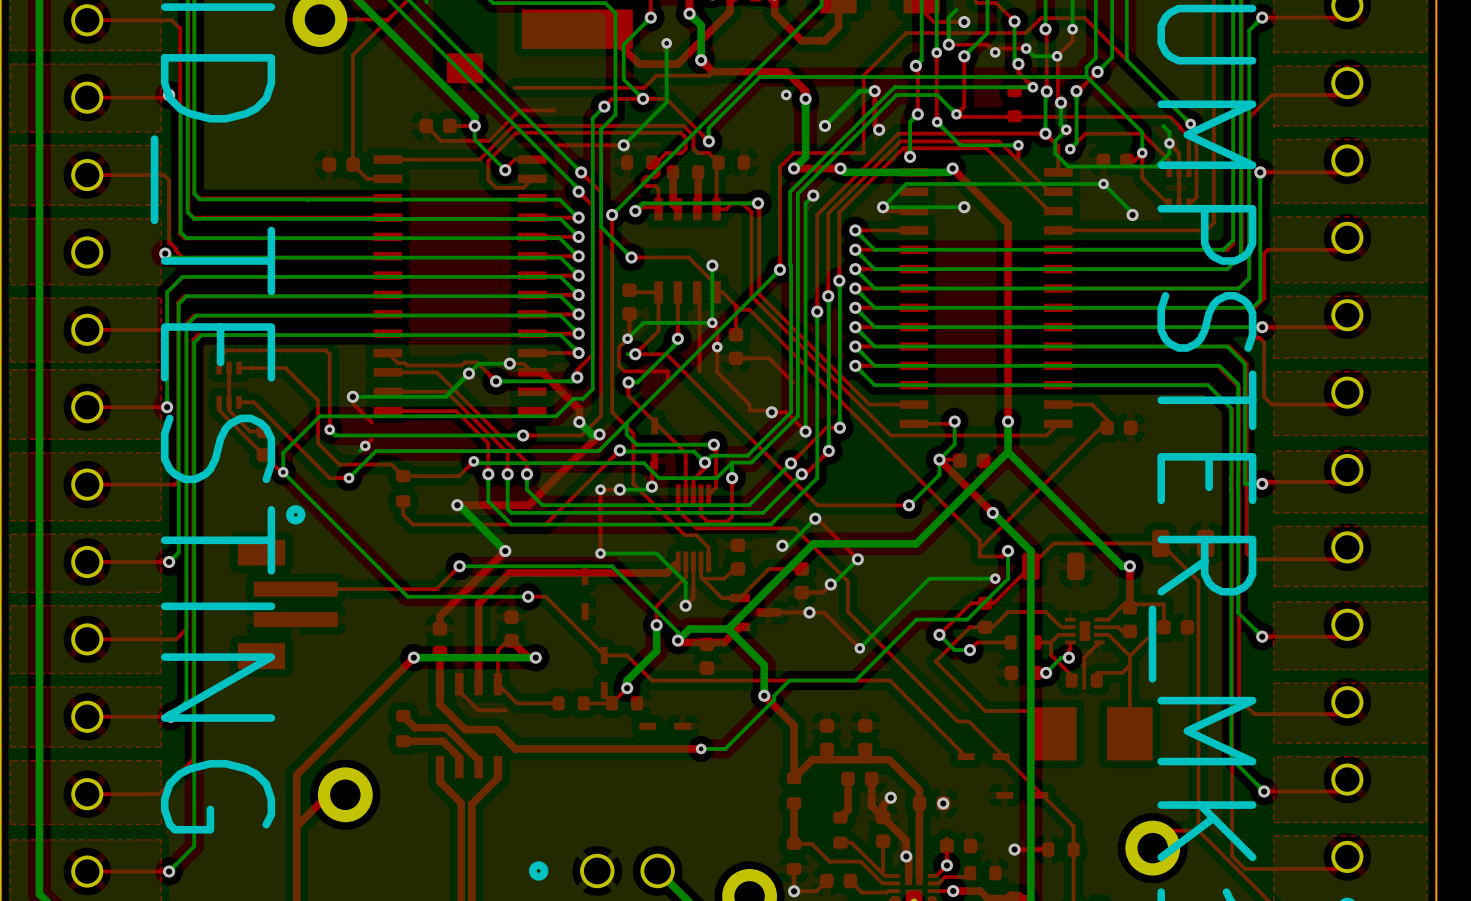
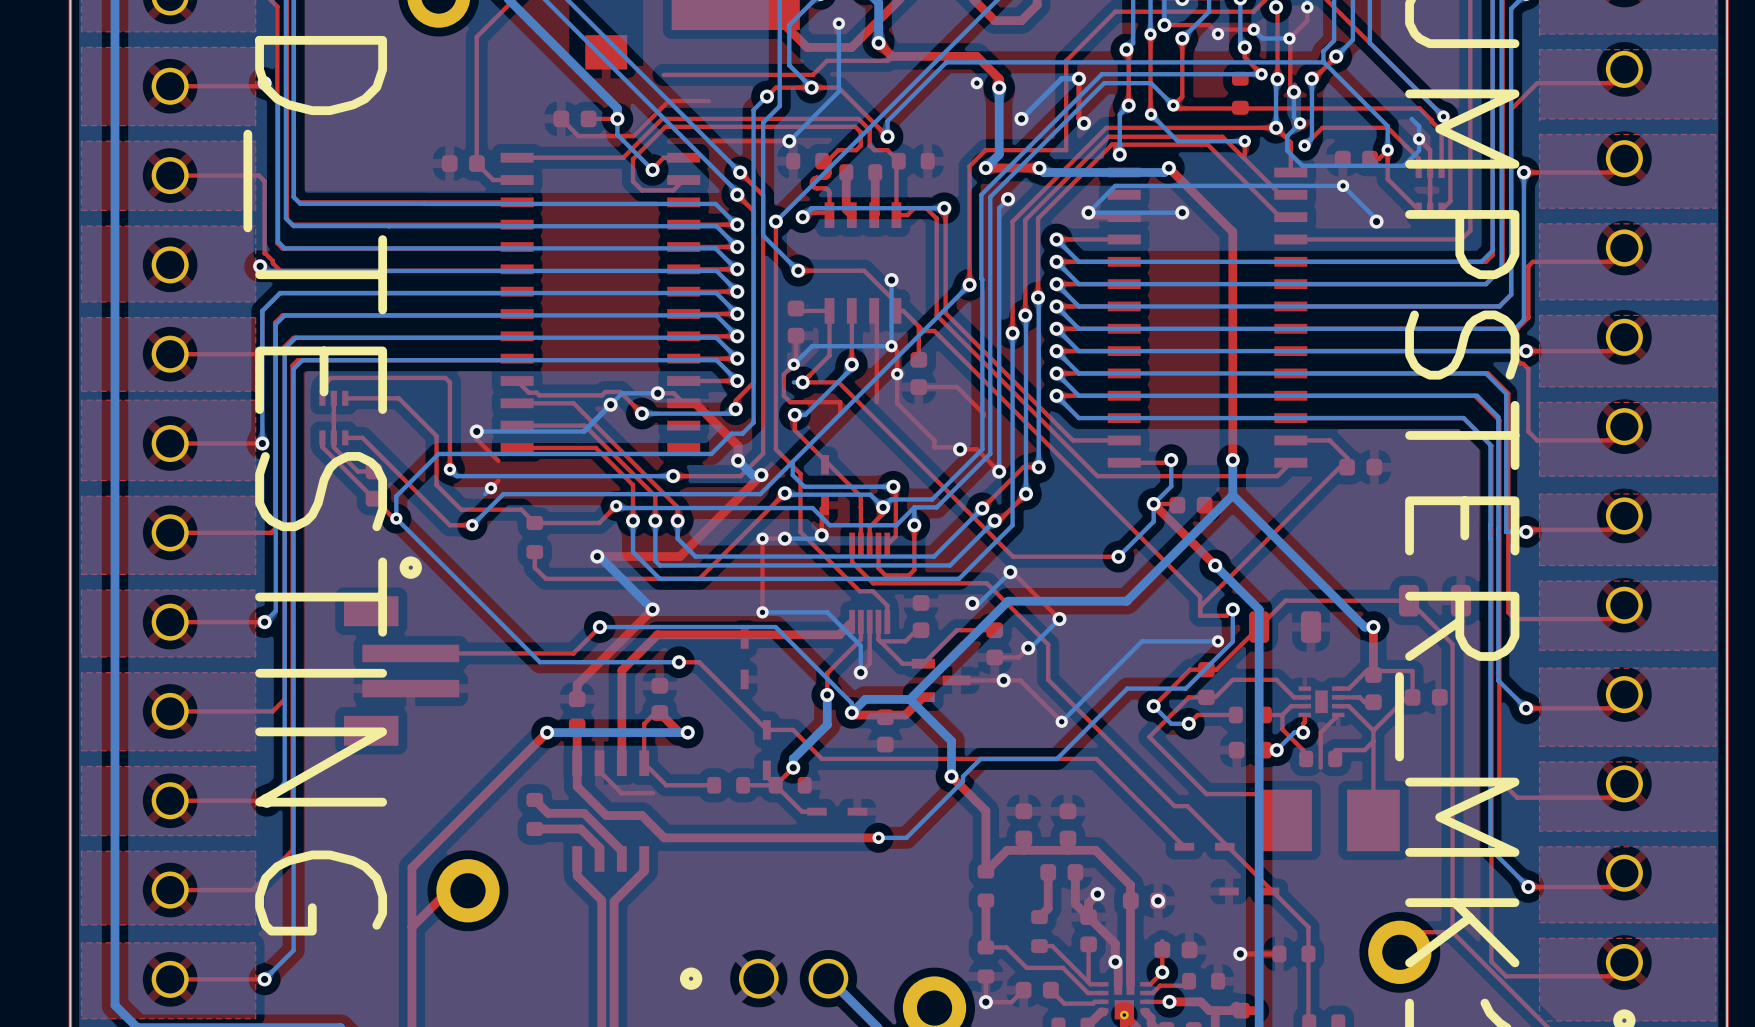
top track: none -> (766, 770) (766, 776) (802, 811) (816, 811)

